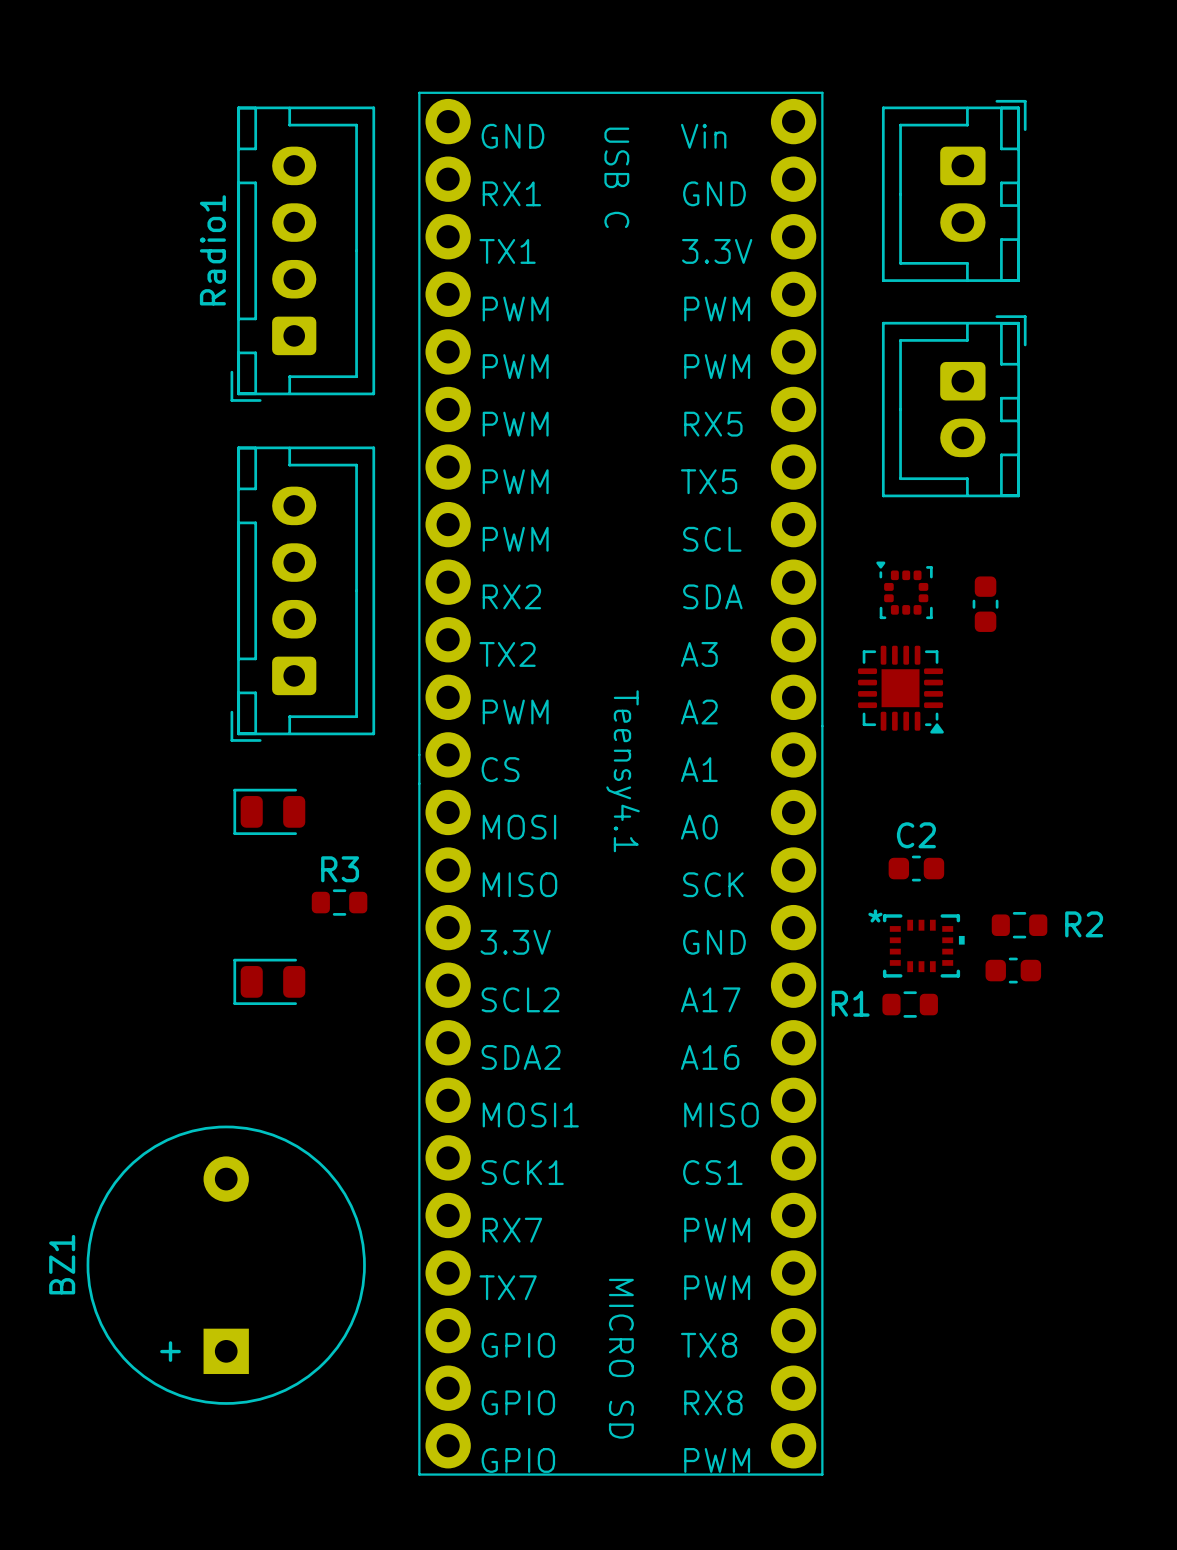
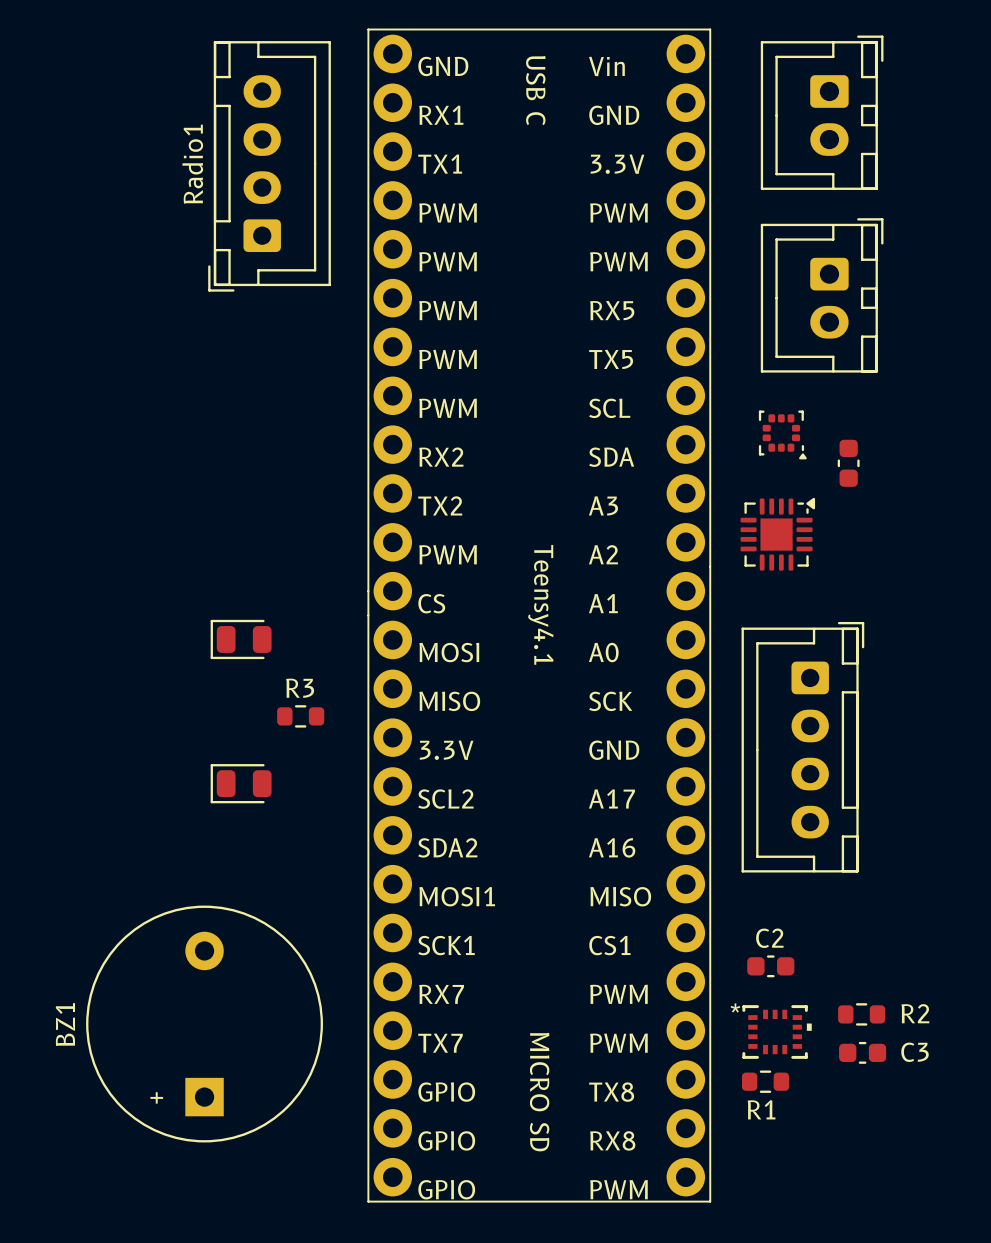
part rotation: 0° (904, 590) -> 180° (782, 434)
part: (302, 594) -> none
part rotation: 0° (900, 689) -> 90° counterclockwise (777, 534)
C2 position: (916, 868) -> (770, 966)
part footprint: [882, 914, 965, 978] -> [741, 621, 865, 873]
R2 position: (1019, 925) -> (861, 1014)
part position: (1013, 970) -> (862, 1052)
R1 name position: R1 (850, 1003) -> R1 (761, 1109)
R1 position: (910, 1004) -> (765, 1081)
part: none -> (777, 1031)
text: none -> C3 (914, 1052)

